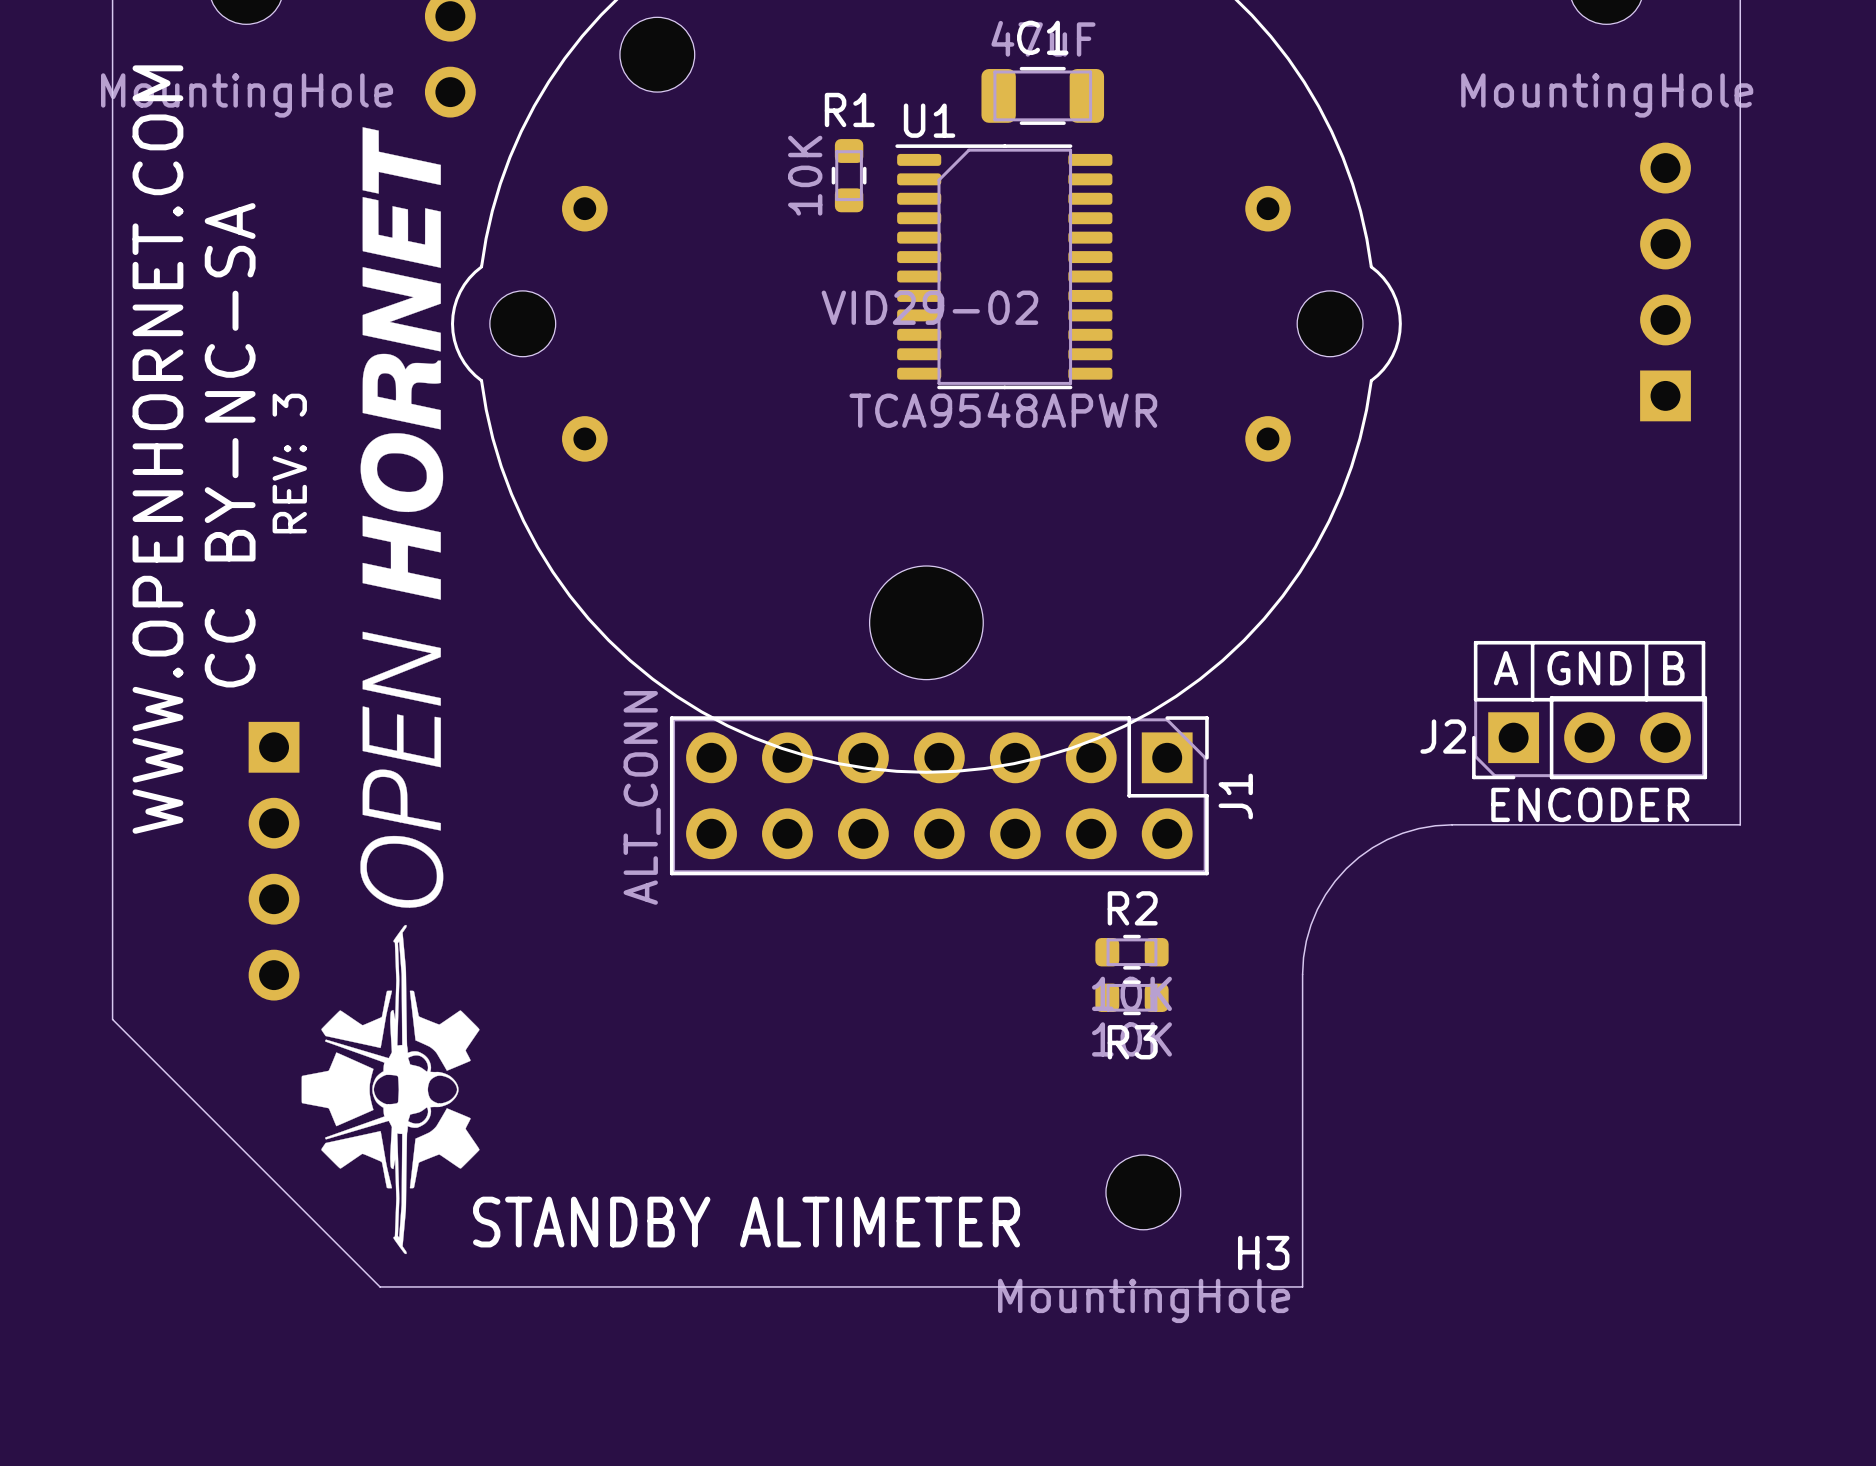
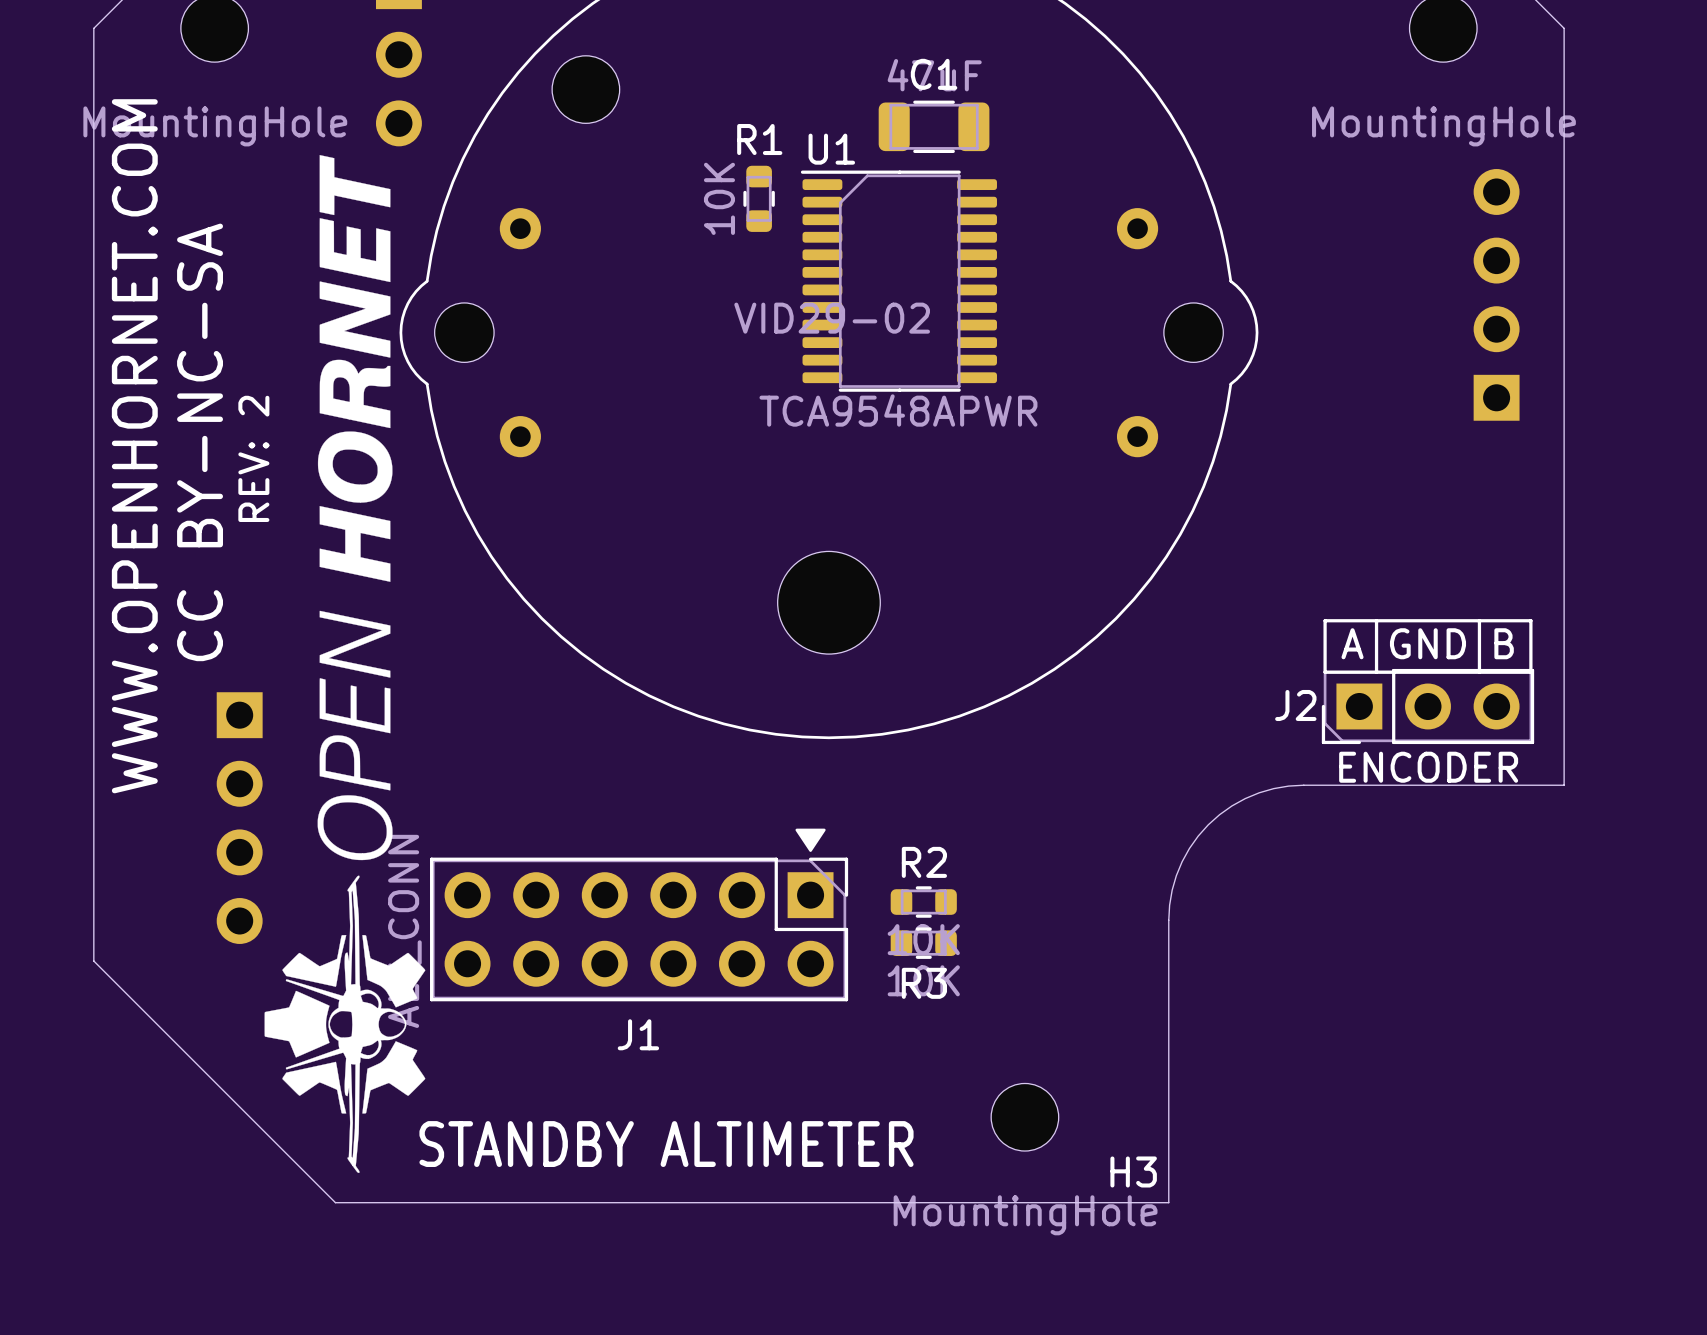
text: REV: 3 (289, 463) -> REV: 2 (253, 458)
J1 footprint: [669, 716, 1209, 876] -> [430, 857, 849, 1002]
J1 name position: J1 (1235, 796) -> J1 (638, 1034)
drawing: none -> [795, 828, 826, 852]
R2 position: (1131, 952) -> (923, 902)
R3 position: (1131, 997) -> (923, 943)

